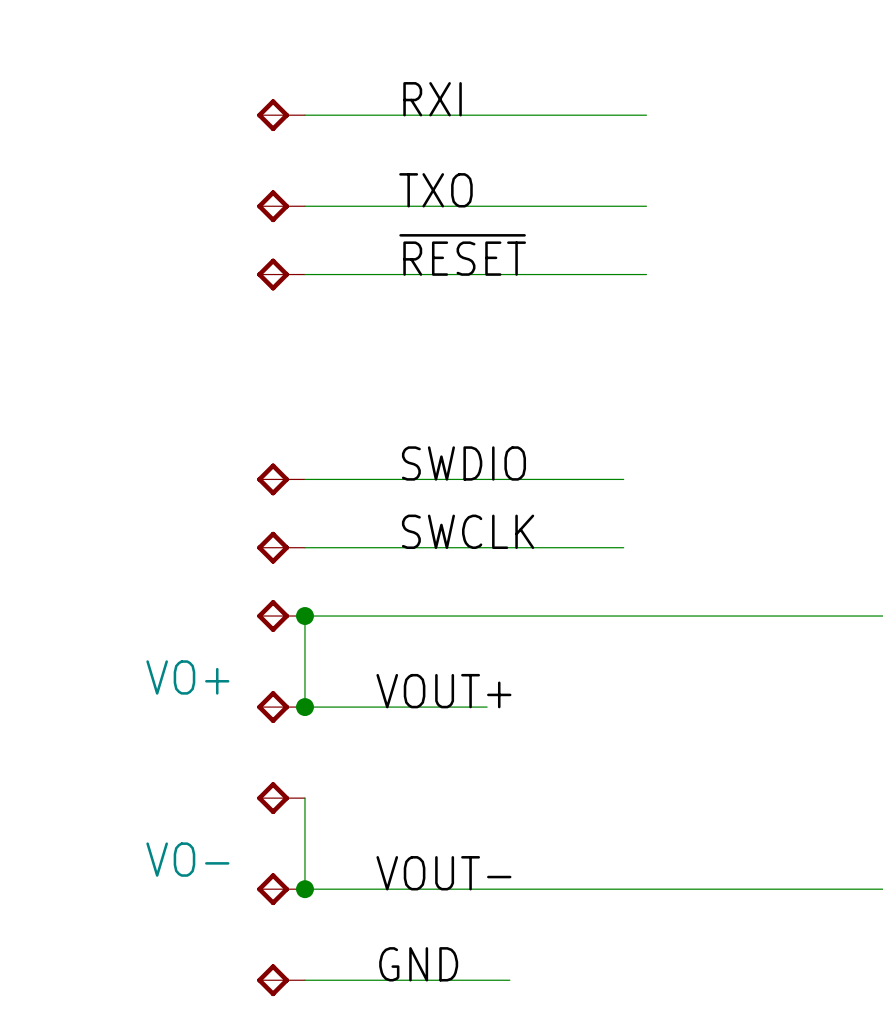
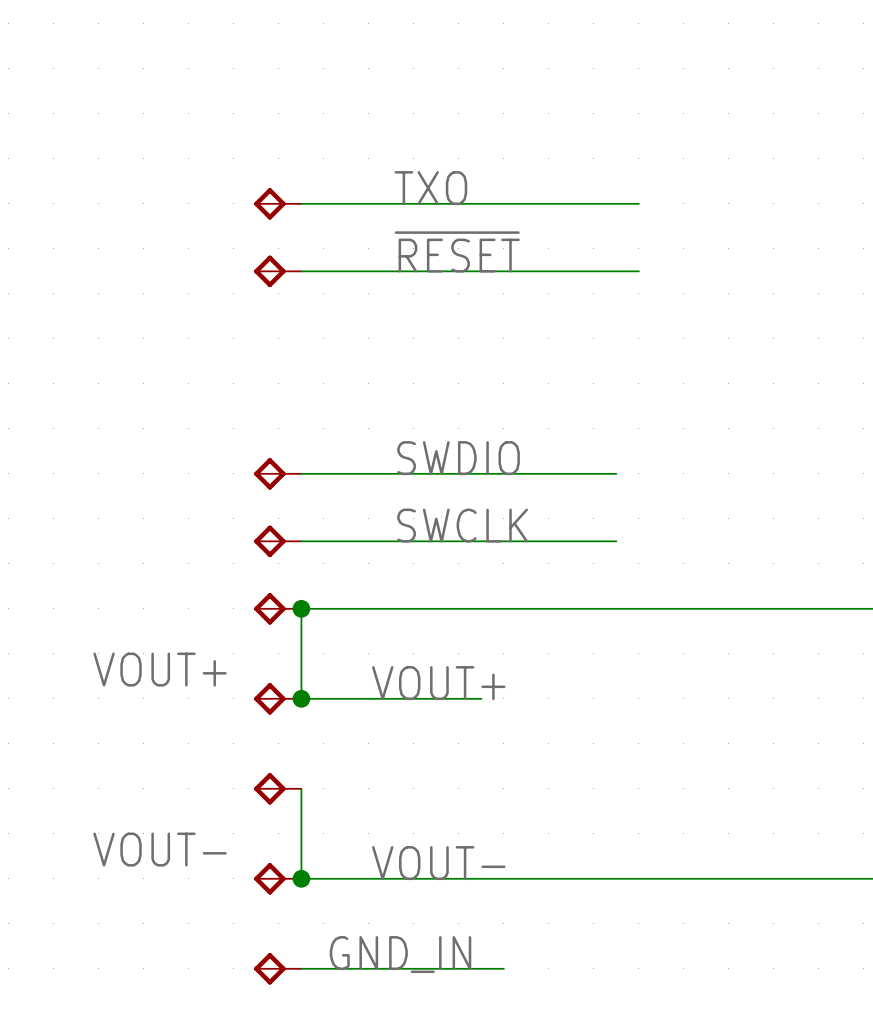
label: RXI (432, 99) -> none
part: (281, 115) -> none
wire: (304, 115) (646, 115) -> none
VO+ name: VO+ (187, 677) -> VOUT+ (160, 669)
VO- name: VO- (187, 859) -> VOUT- (160, 849)
label: GND (418, 964) -> GND_IN (400, 954)

